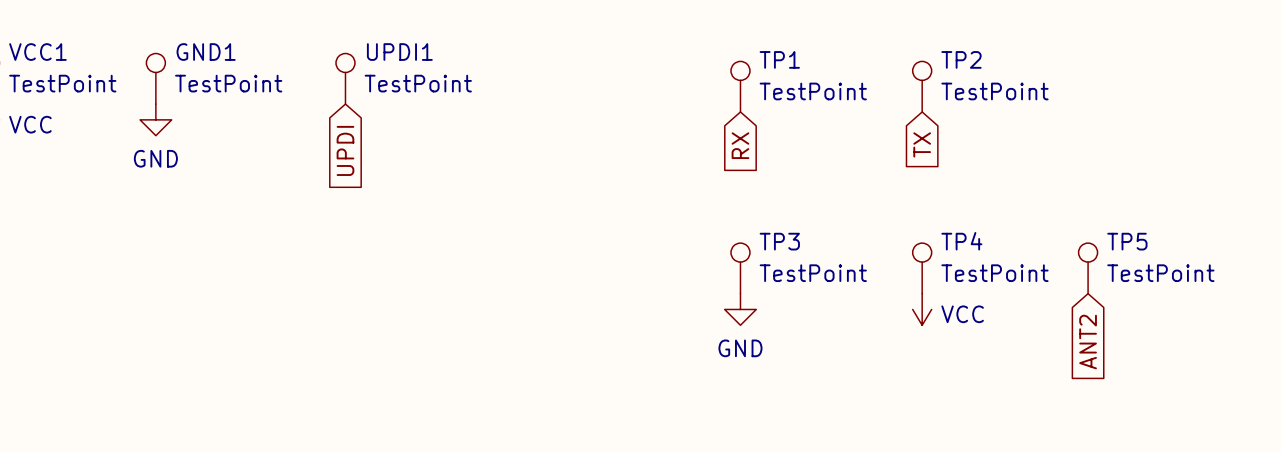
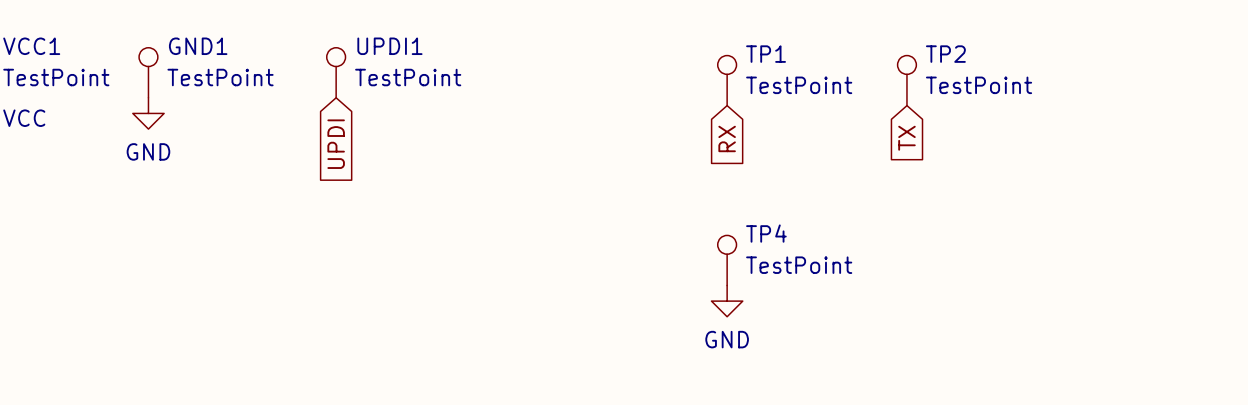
TP3 name: TP3 (779, 241) -> TP4 (766, 233)
TP4: TestPoint (922, 268) -> none
TP5: TestPoint (1088, 268) -> none
power symbol: VCC (922, 309) -> none
global label: ANT2 (1088, 342) -> none

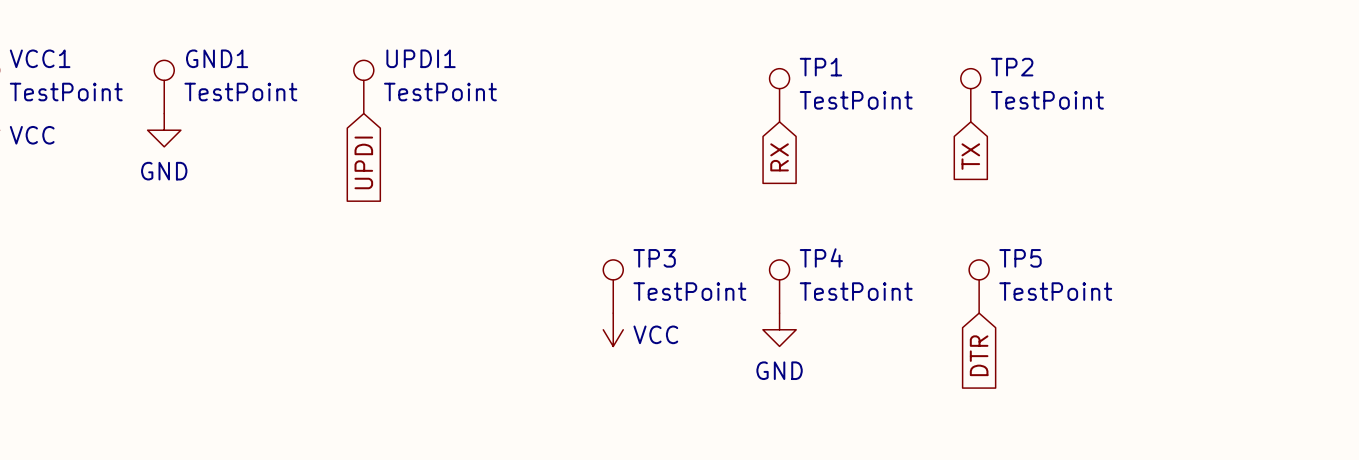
TP3: none -> TestPoint (613, 286)
TP5: none -> TestPoint (979, 286)
power symbol: none -> VCC (613, 329)
global label: none -> DTR (979, 355)

